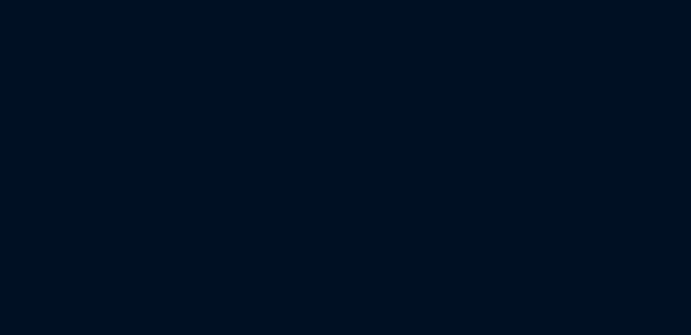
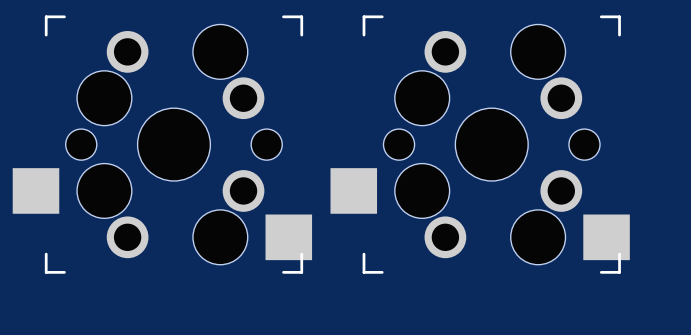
part: none -> (162, 144)
part: none -> (480, 144)

